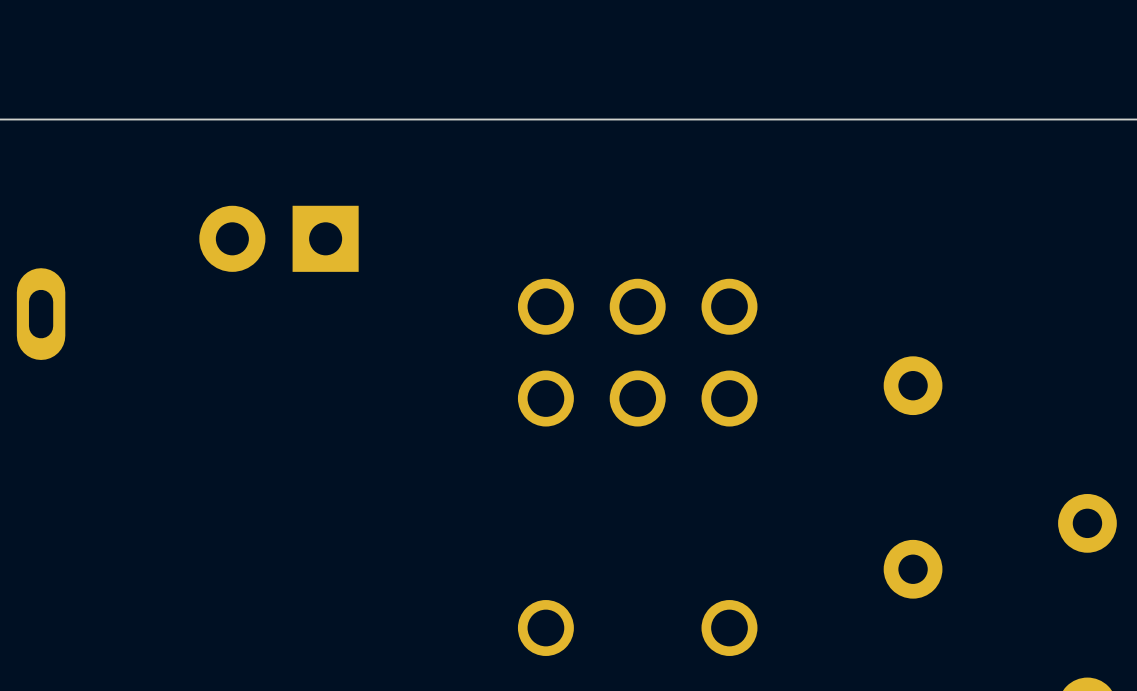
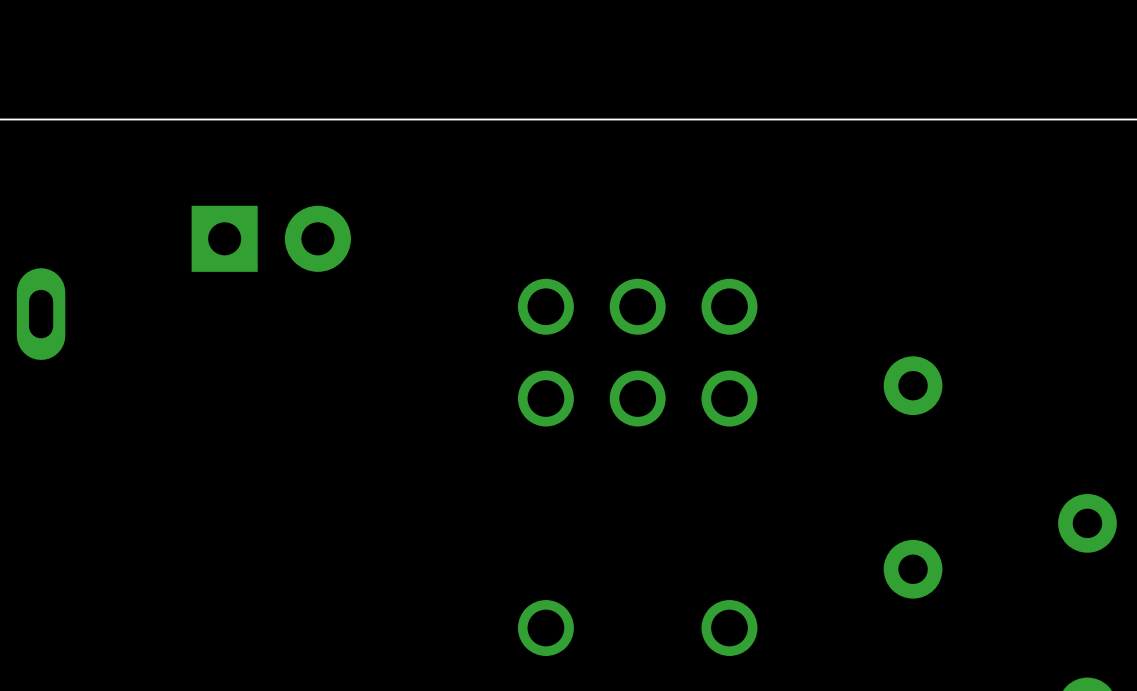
part rotation: 0° (278, 238) -> 180° (271, 238)

